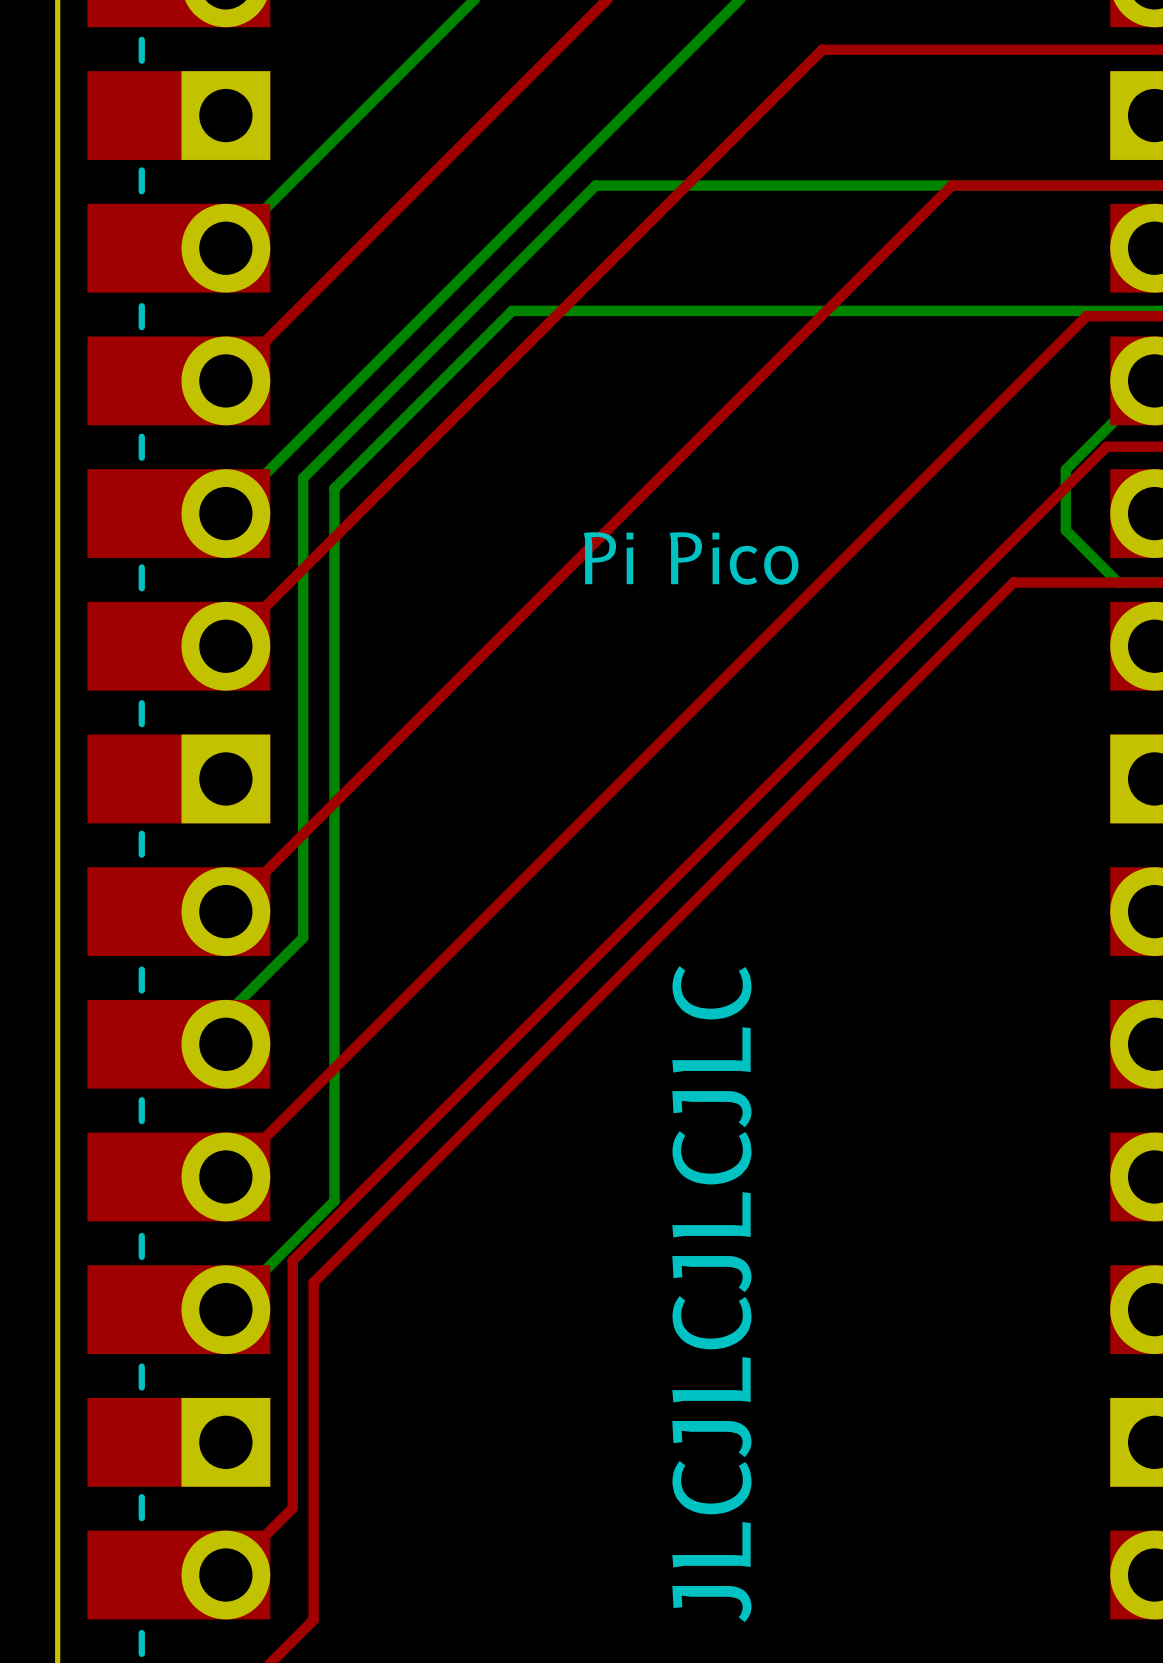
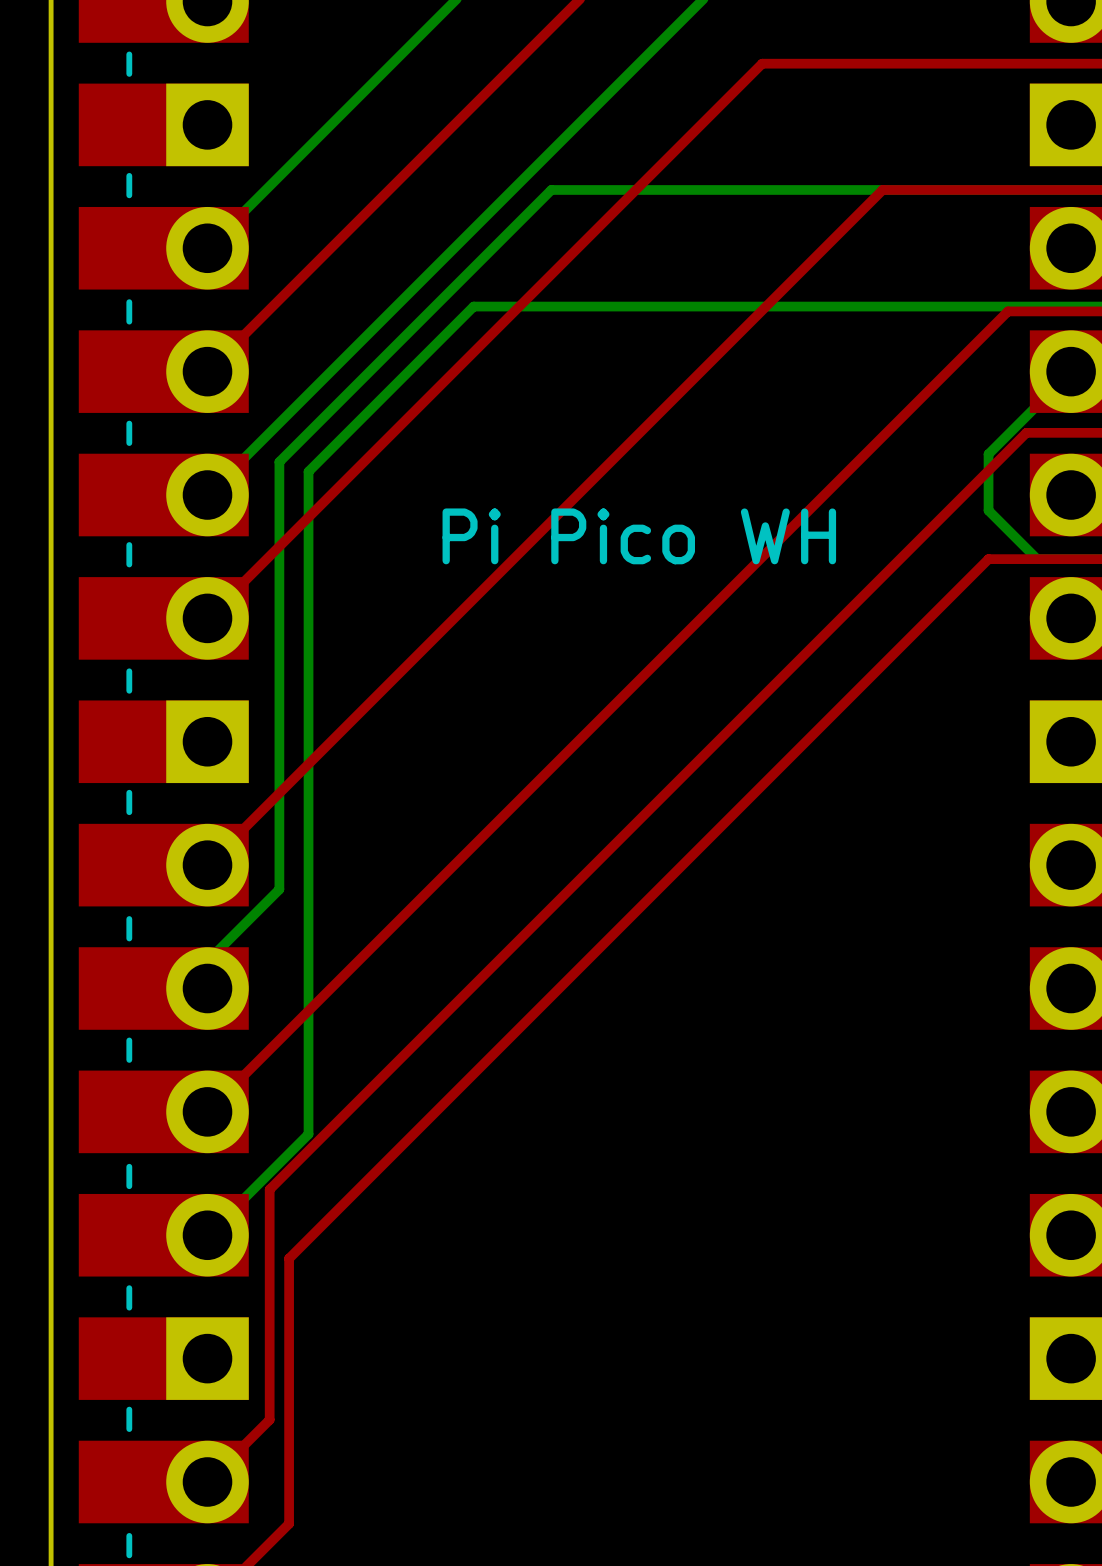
part value: Pi Pico (691, 558) -> Pi Pico WH (639, 536)
top track: (1065, 582) (1013, 582) (313, 1282) (313, 1334) -> (988, 559) (289, 1258)
text: JLCJLCJLCJLC (711, 1294) -> none

